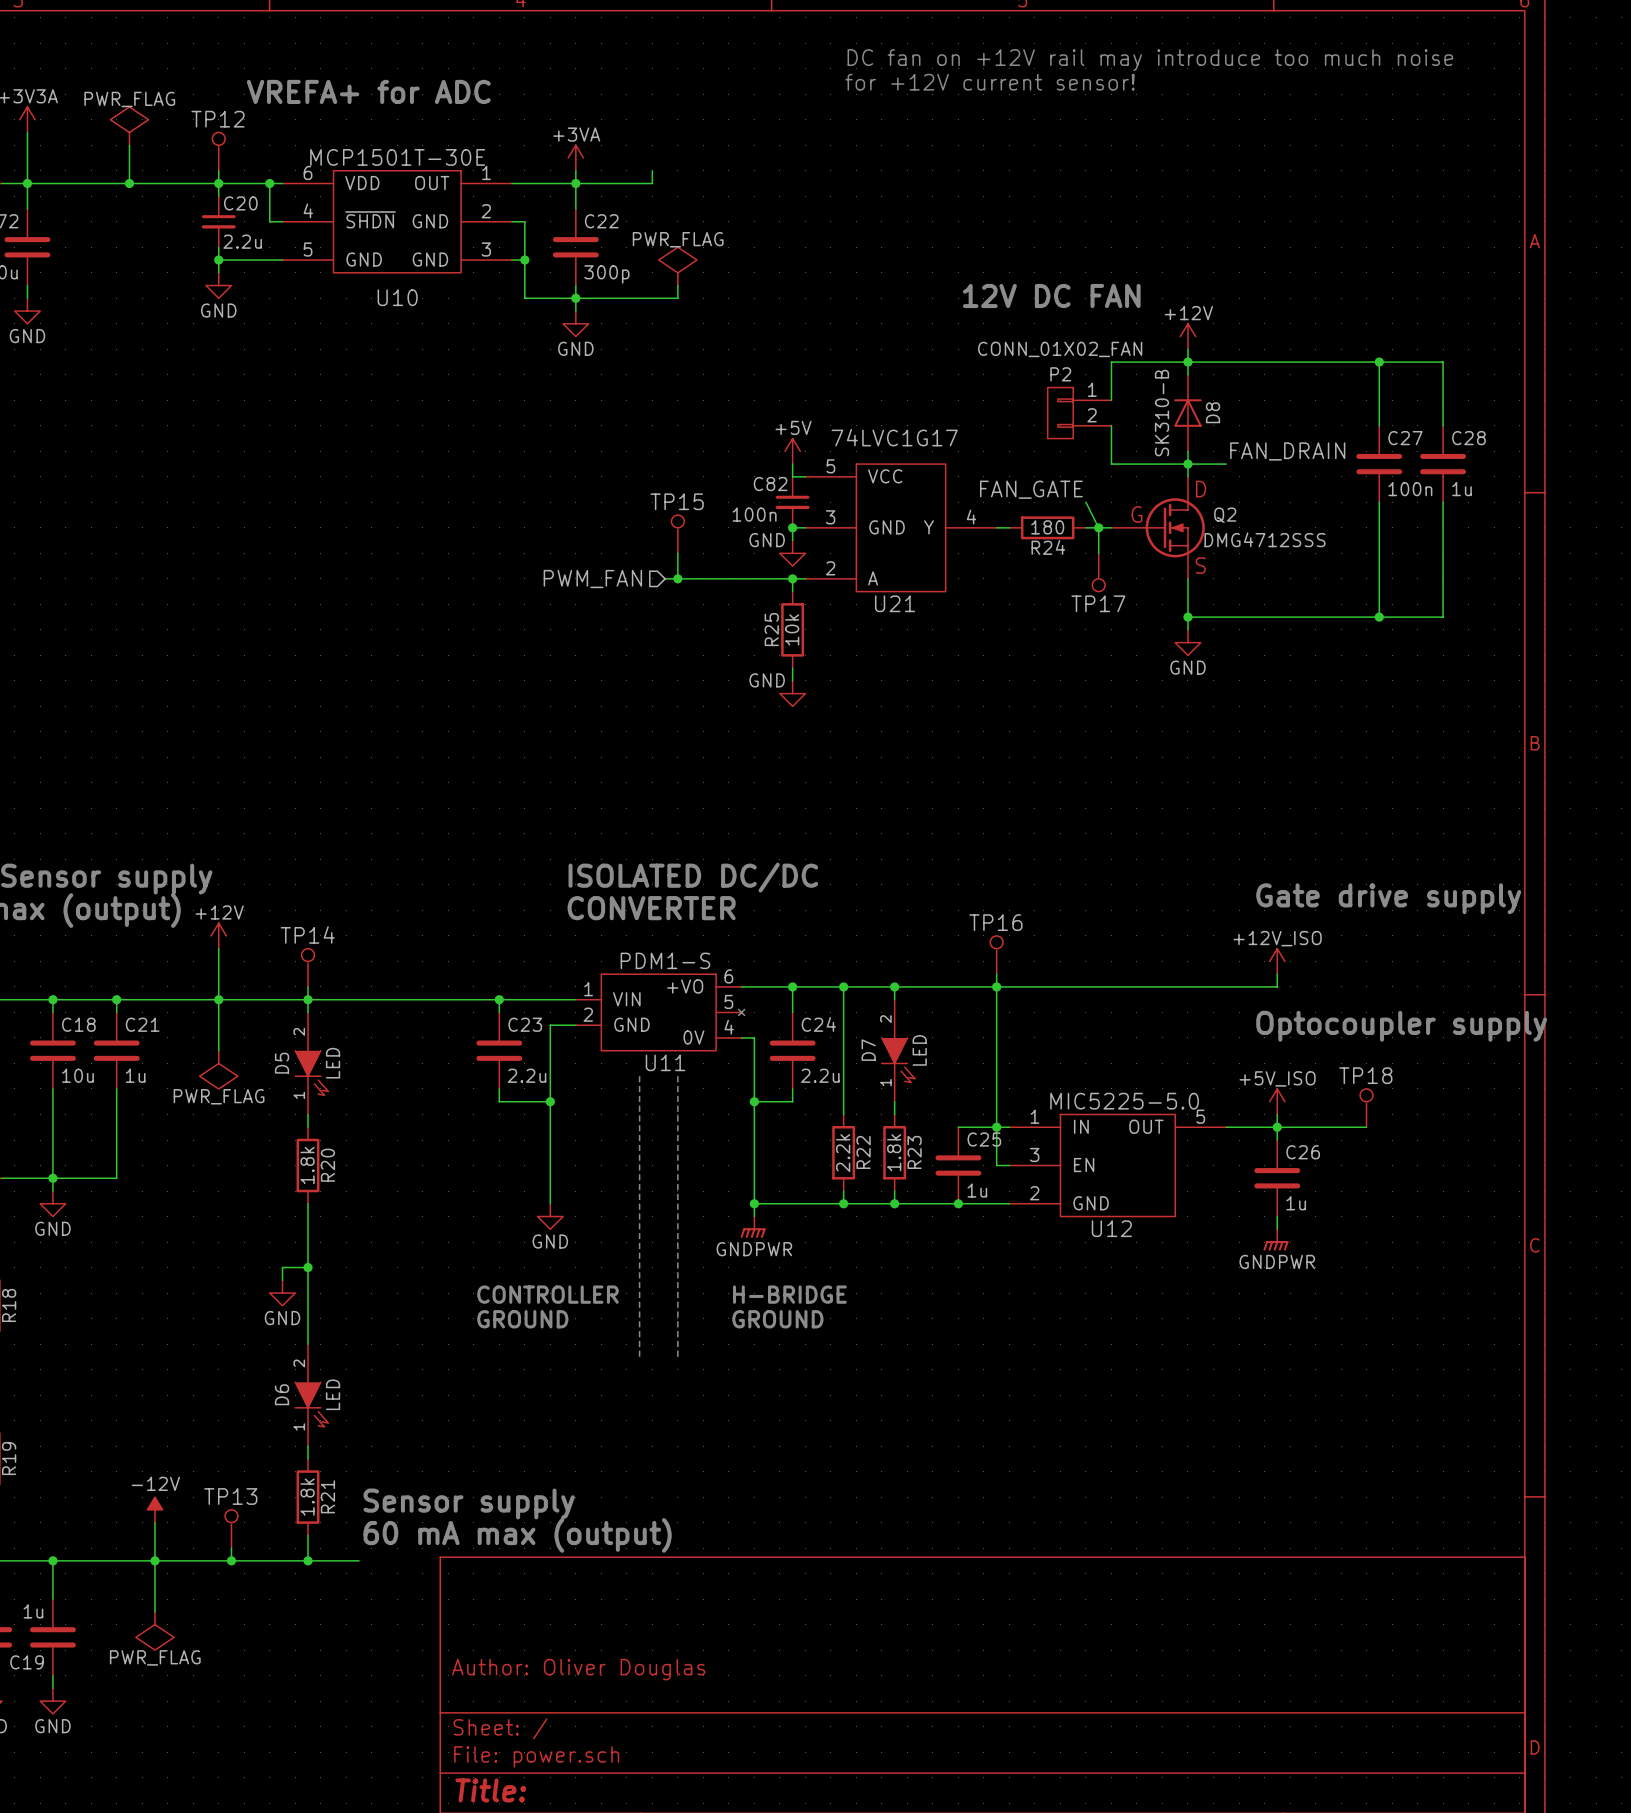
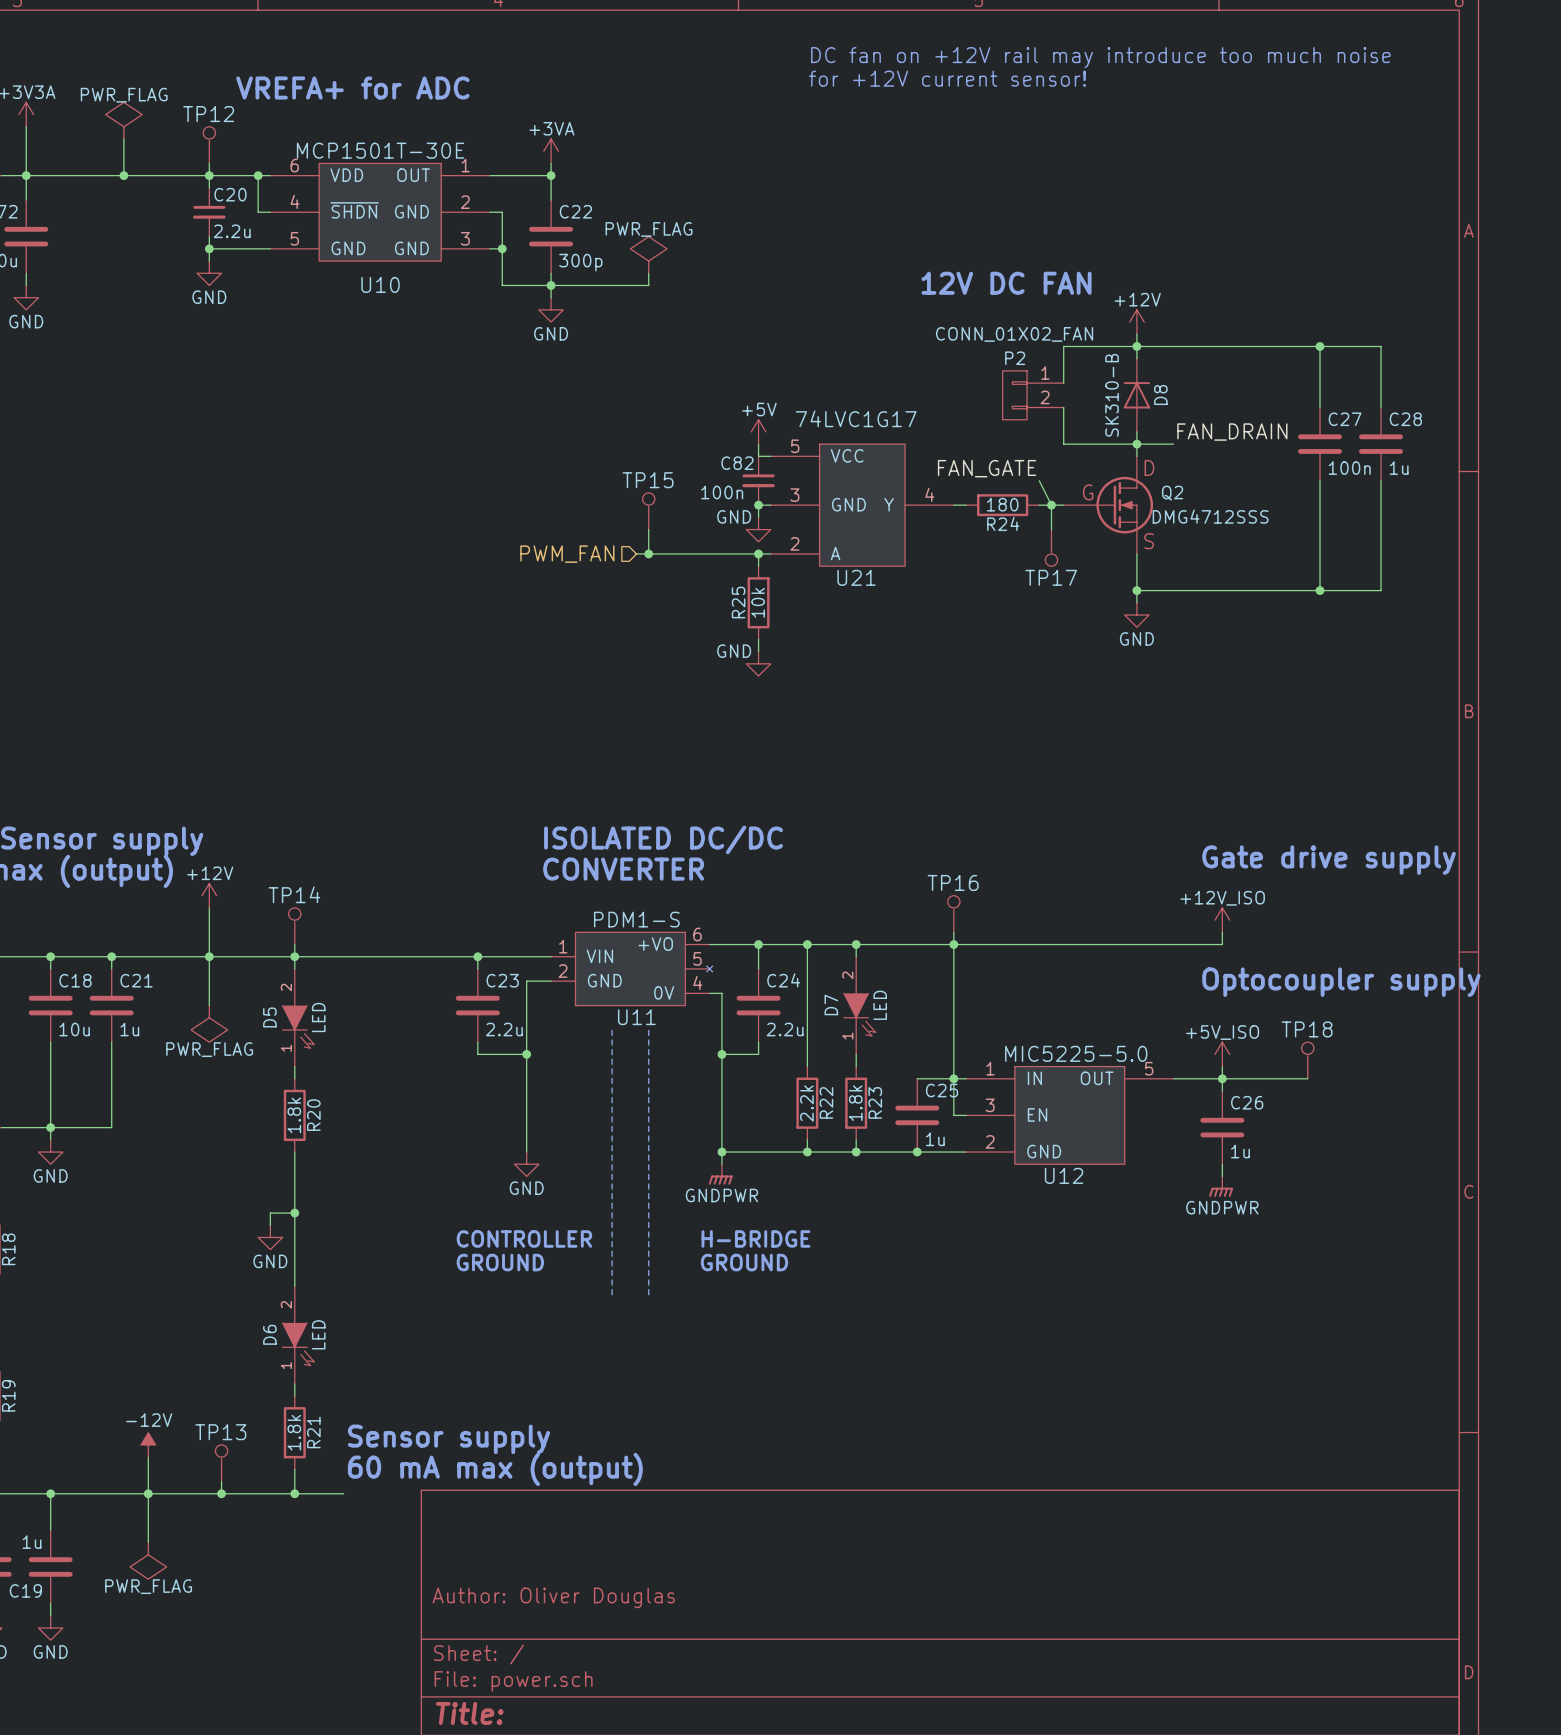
wire: (652, 170) (652, 183) (575, 183) -> none

